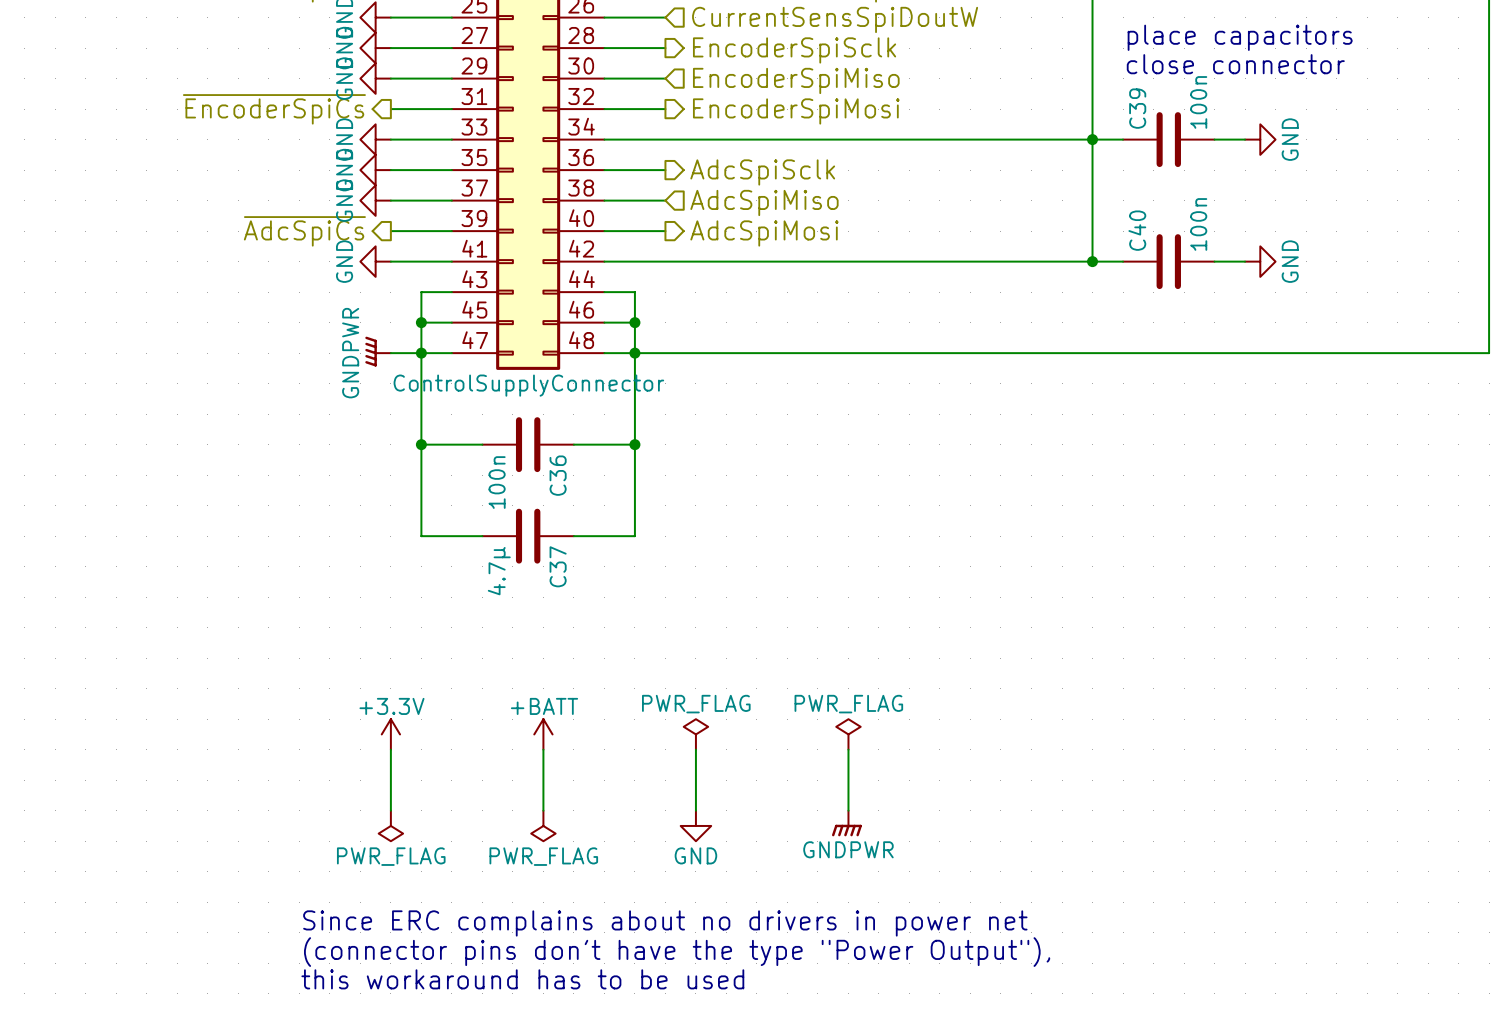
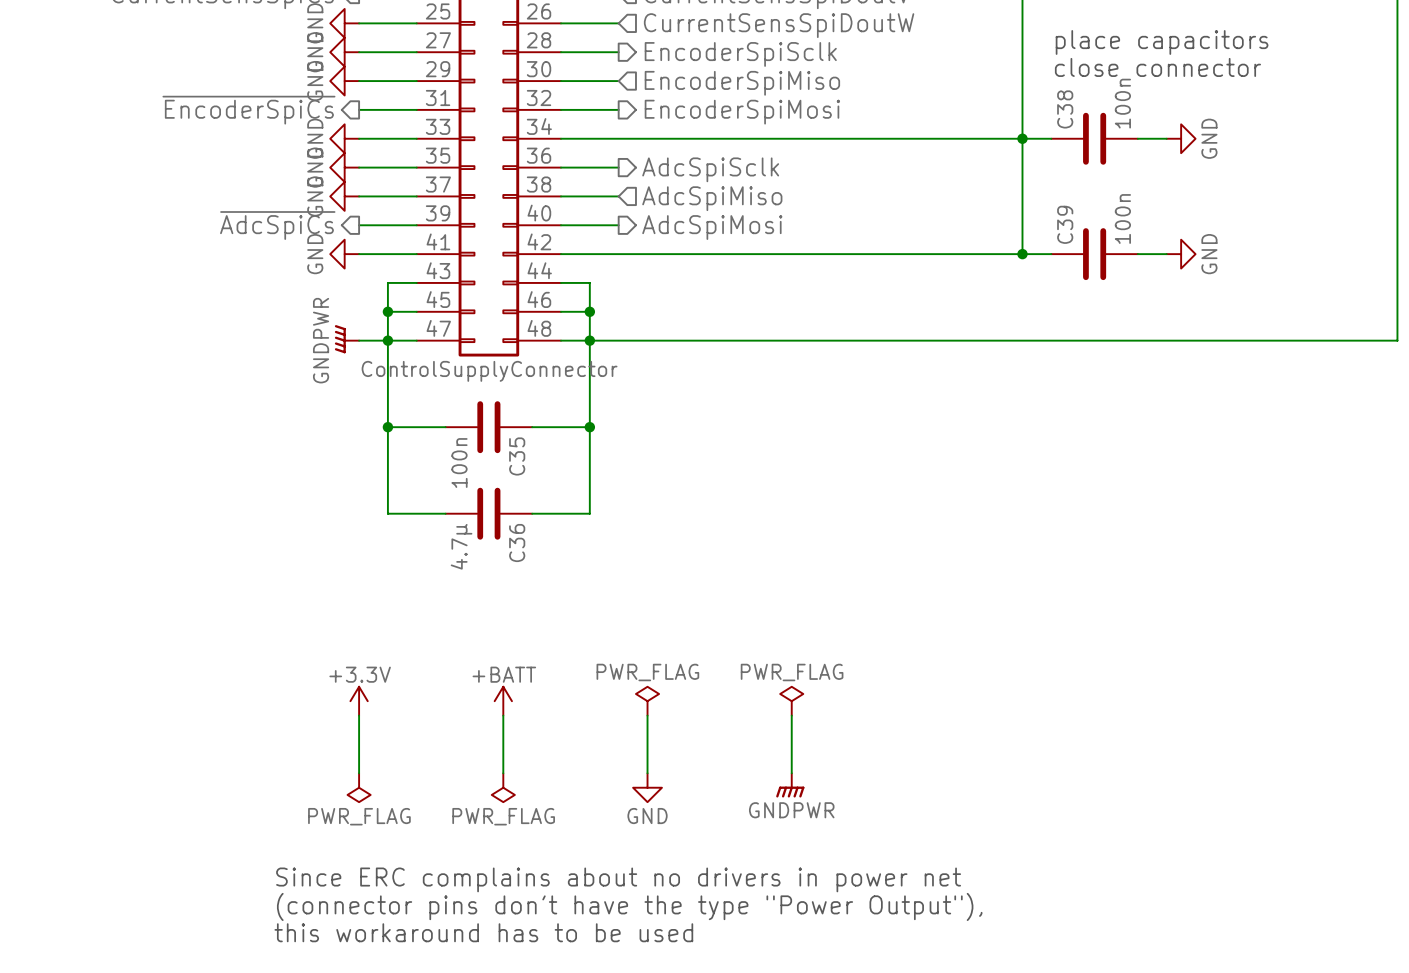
C39 name: C39 (1137, 108) -> C38 (1065, 109)
C40 name: C40 (1137, 230) -> C39 (1065, 224)
C36 name: C36 (558, 475) -> C35 (517, 456)
C37 name: C37 (558, 566) -> C36 (517, 543)

